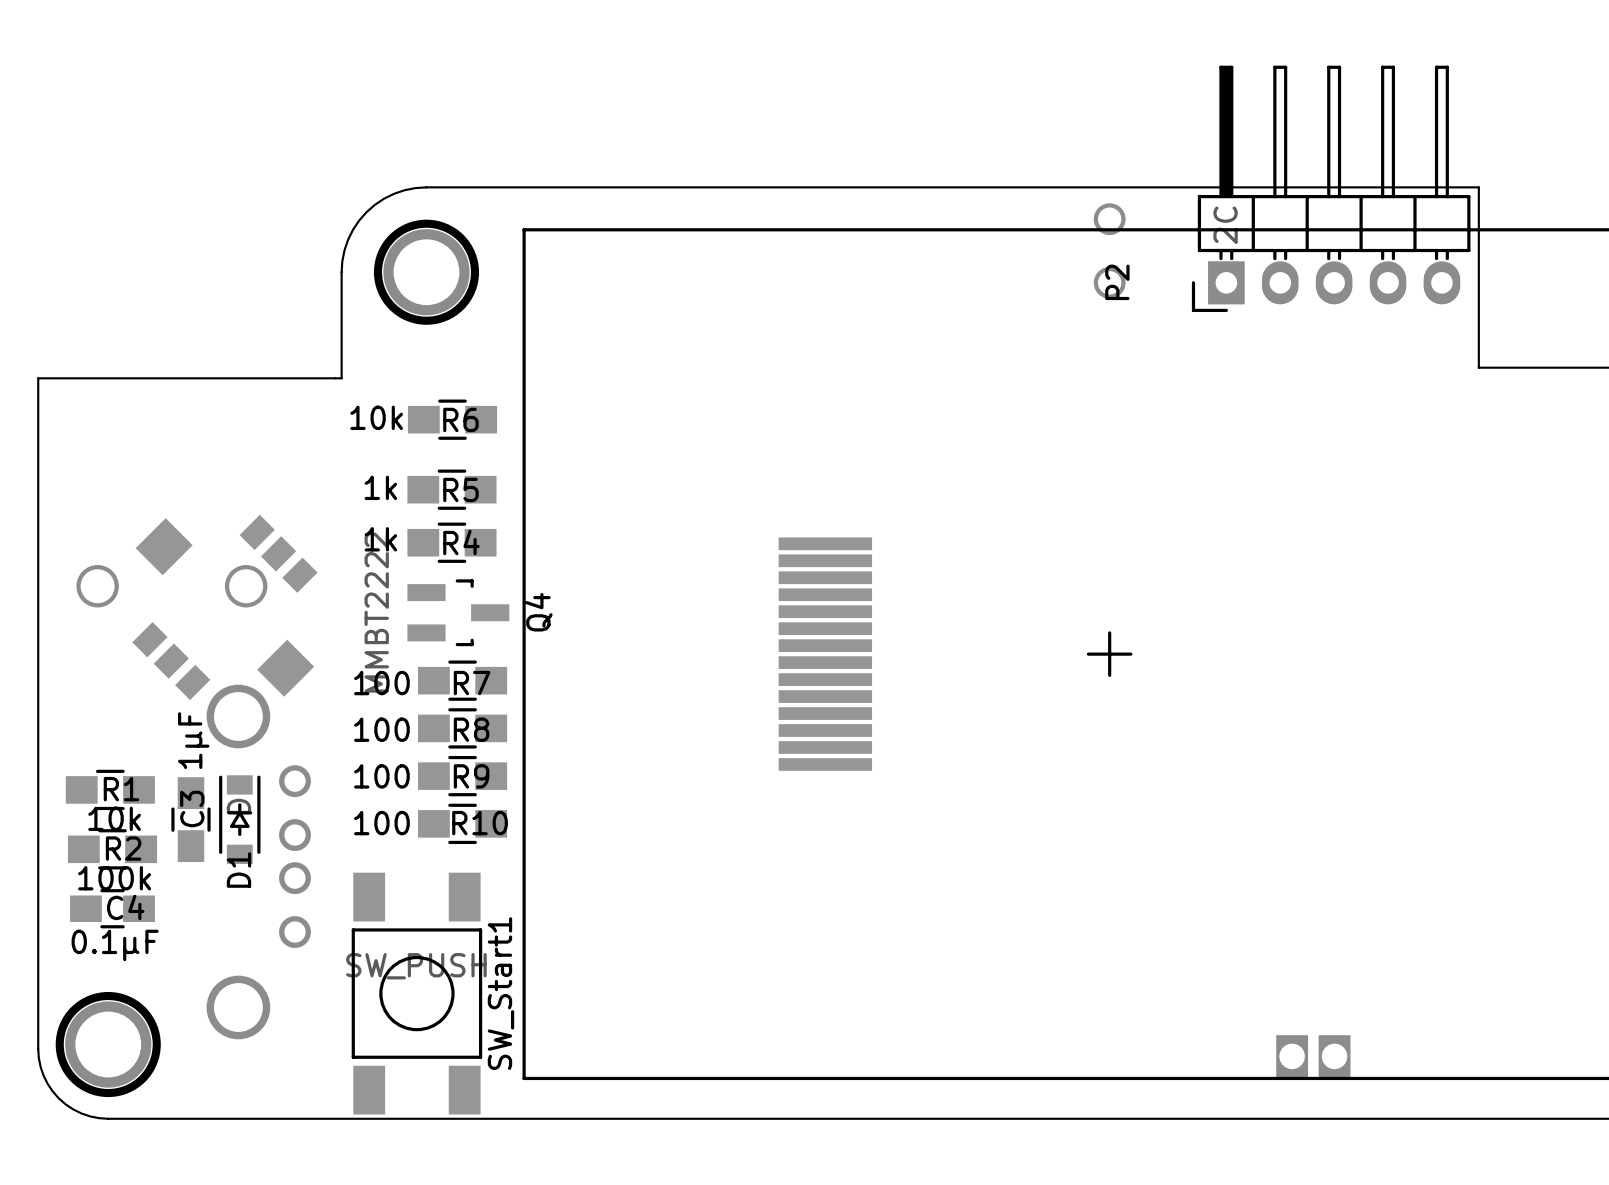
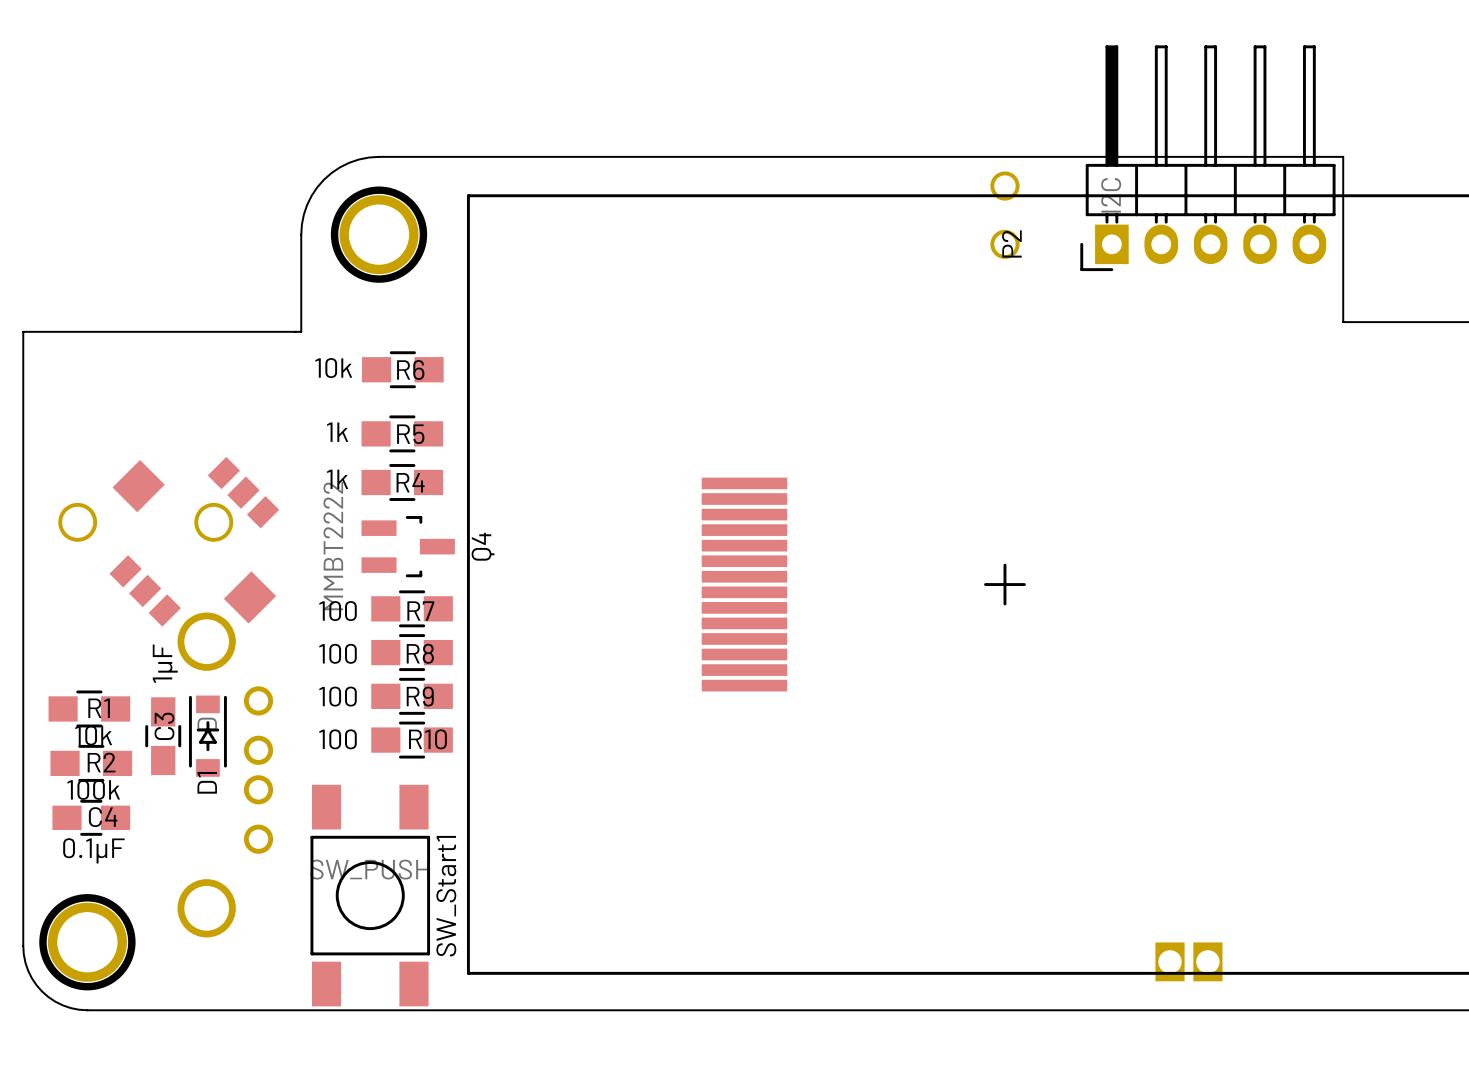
part footprint: [1276, 1035, 1351, 1078] -> [1155, 942, 1223, 982]

